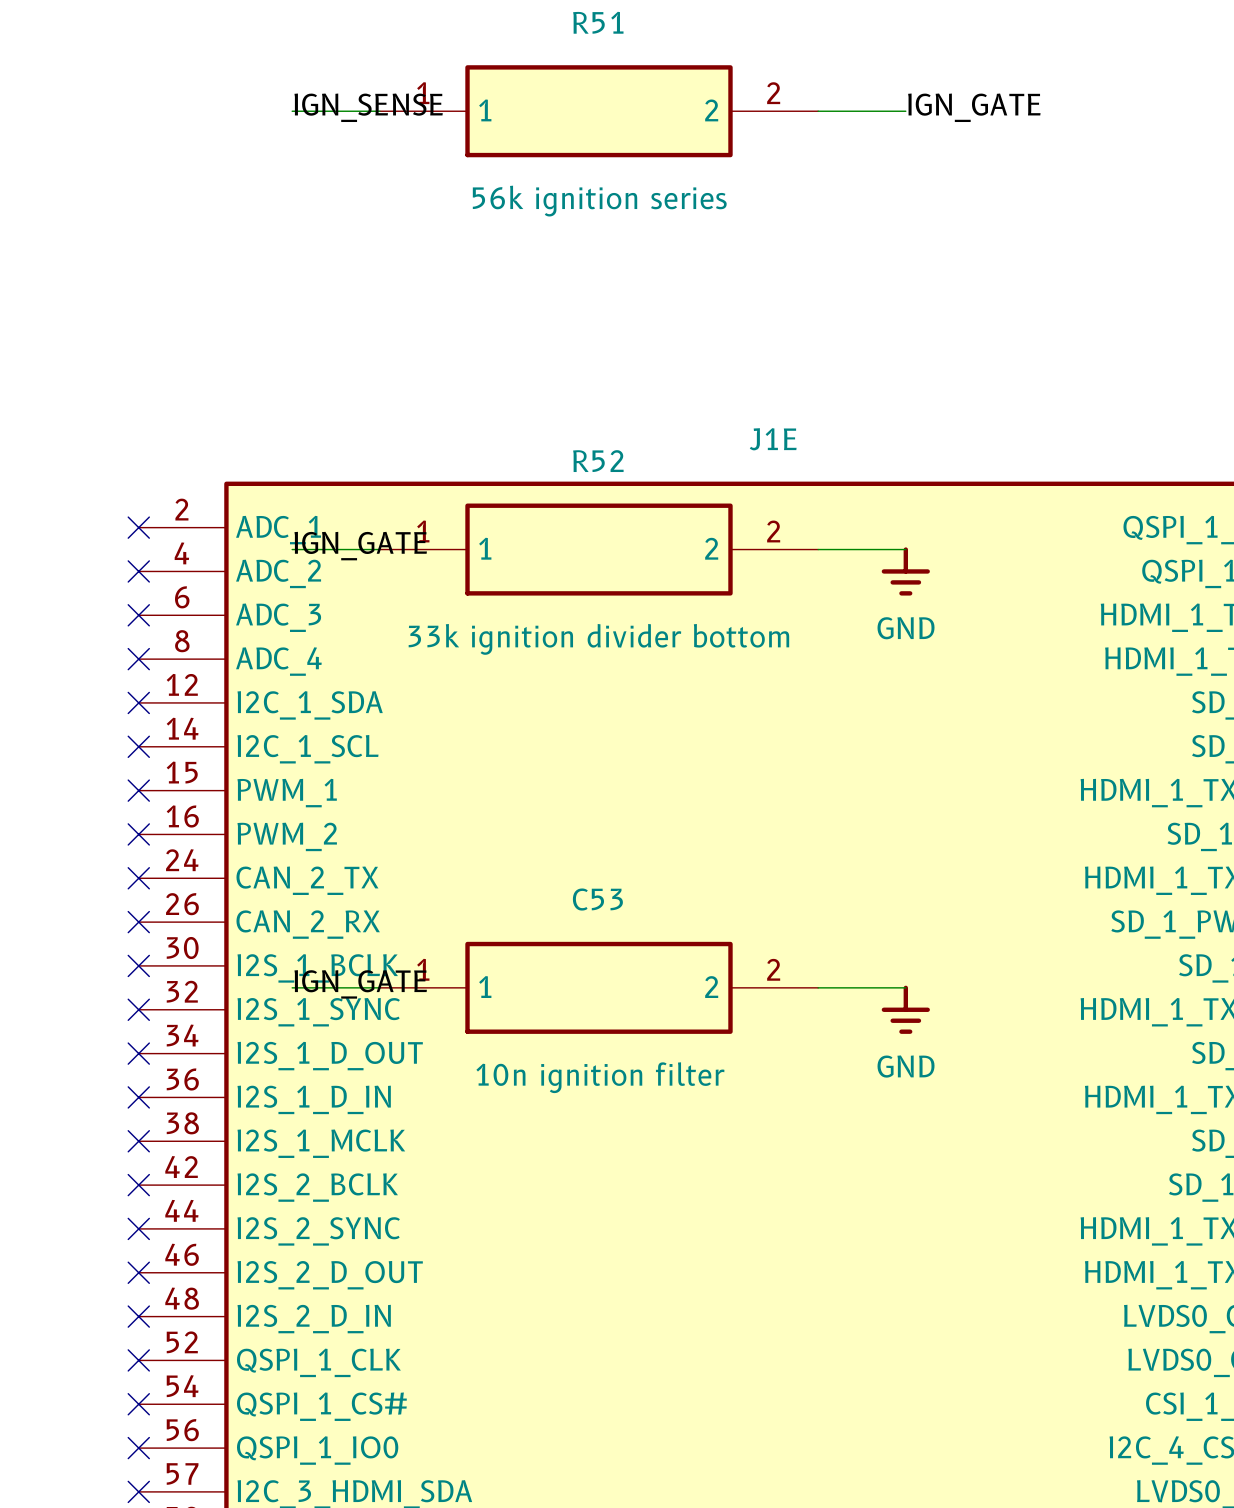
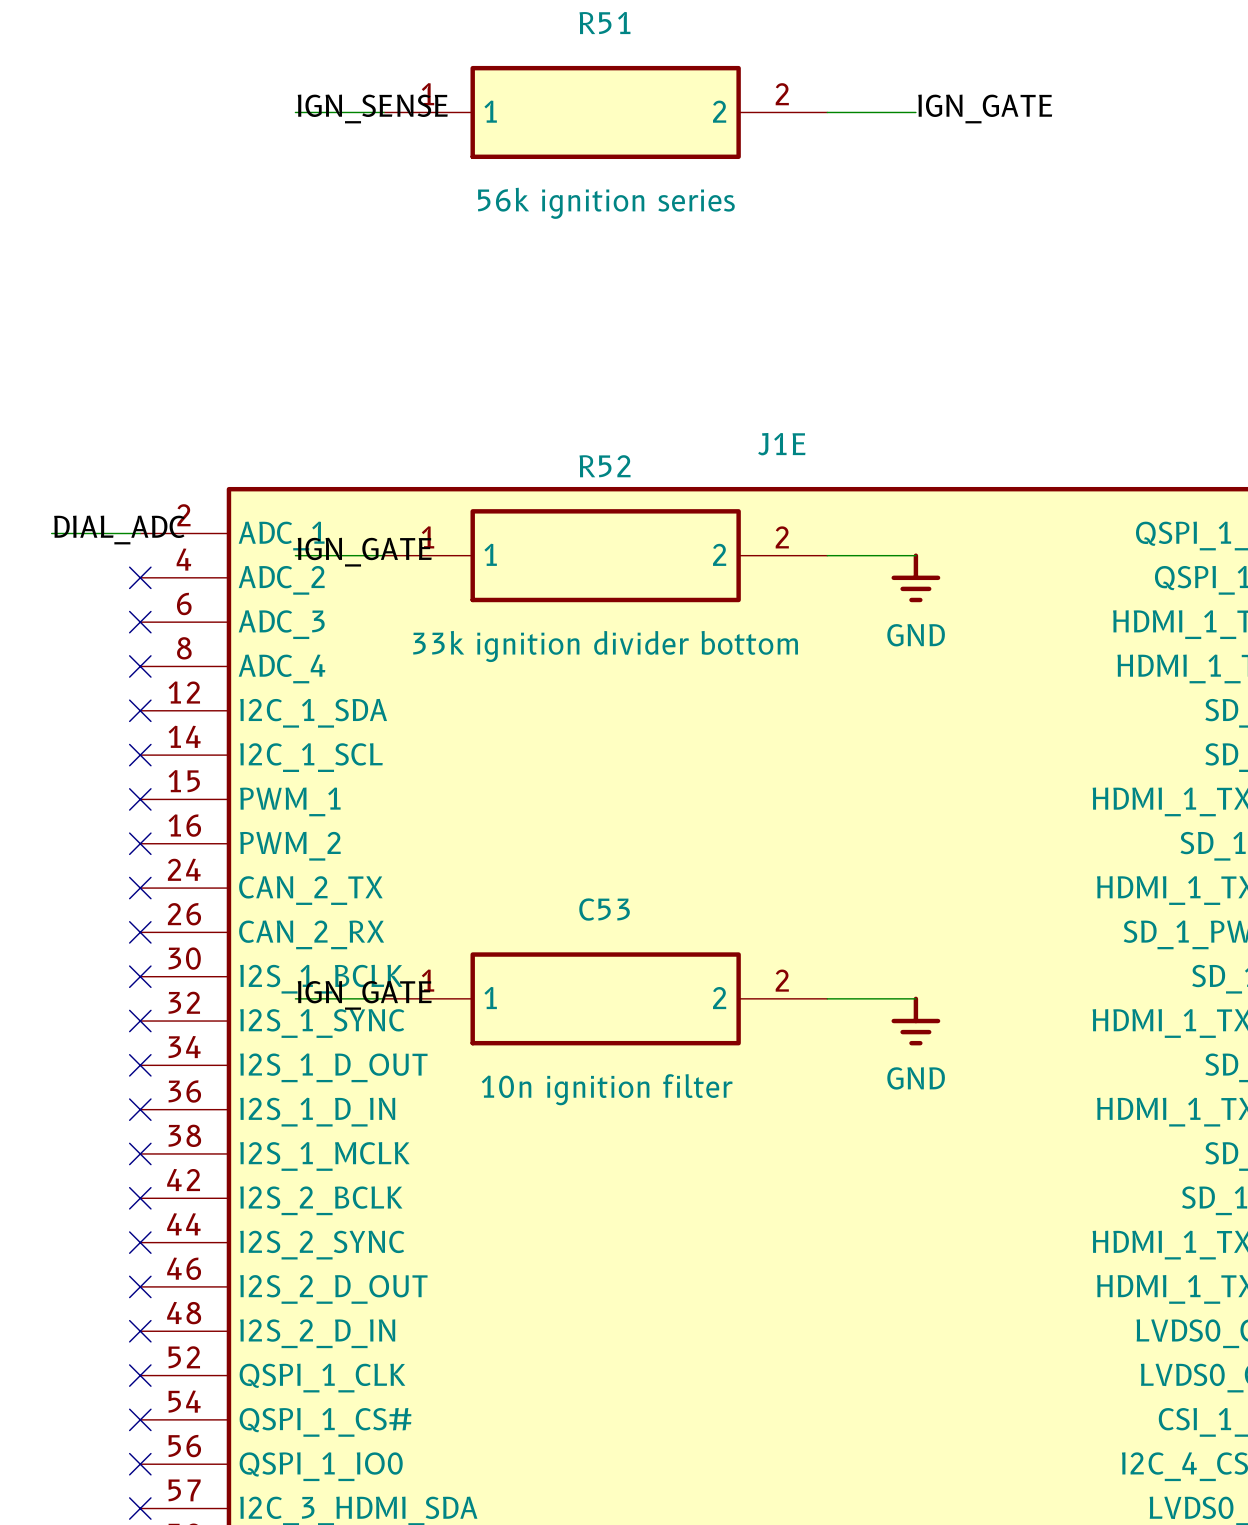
label: none -> DIAL_ADC (119, 530)
wire: none -> (51, 533) (140, 533)
no-connect mark: (138, 527) -> none

